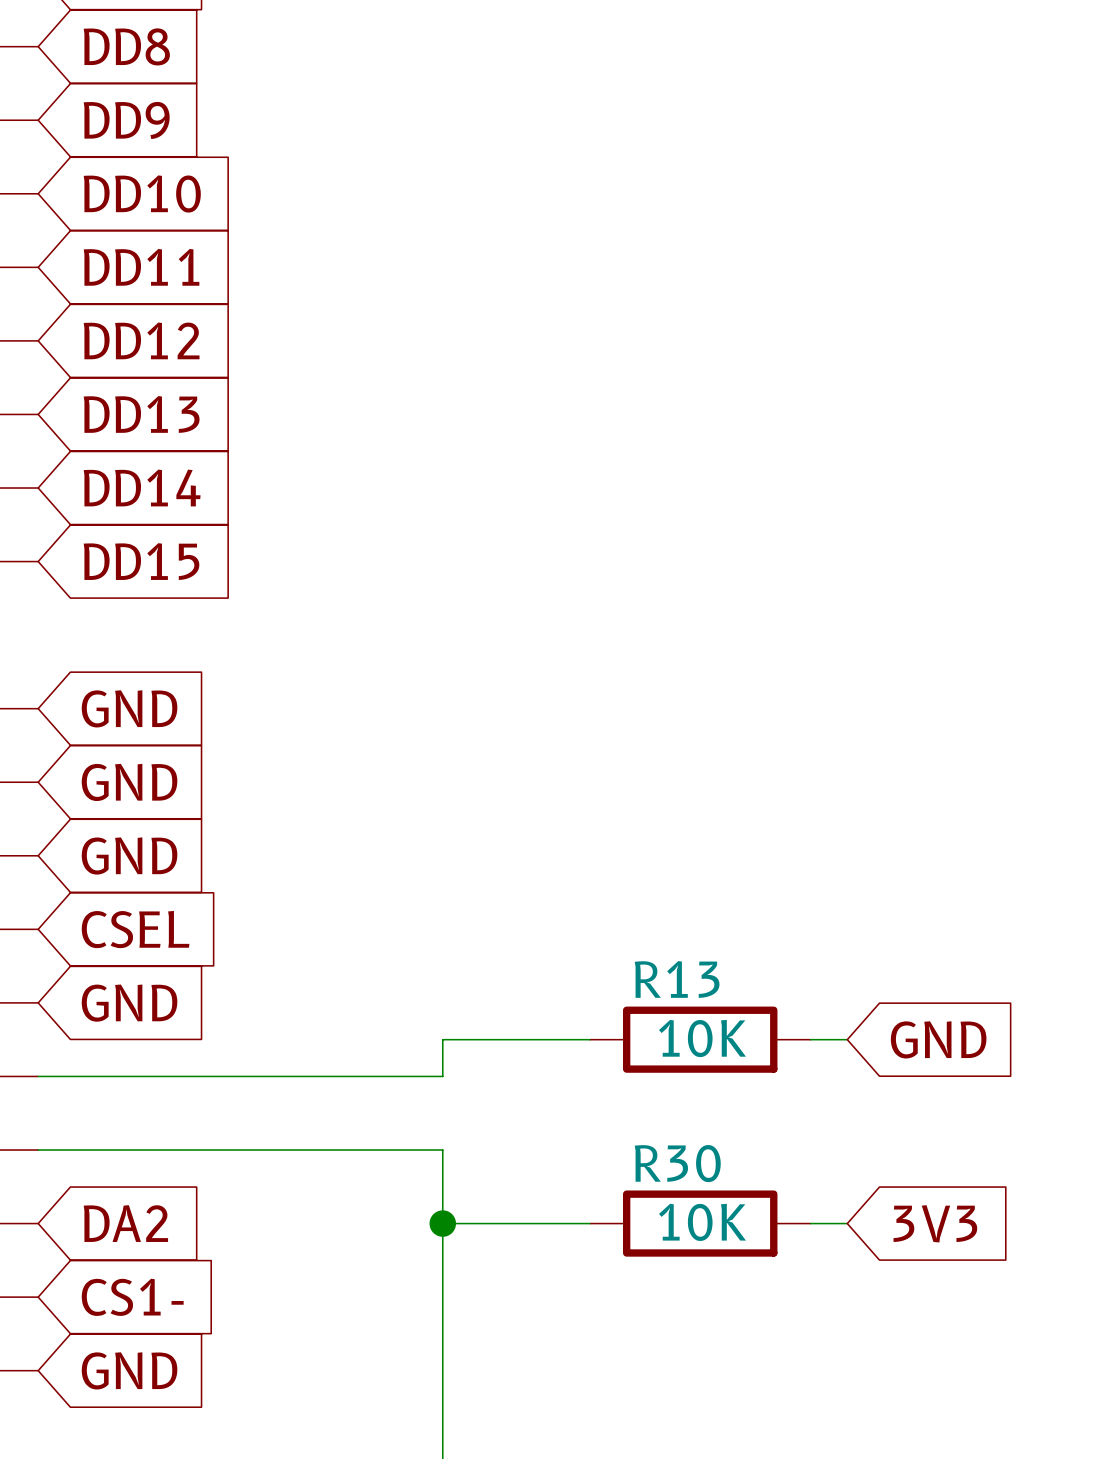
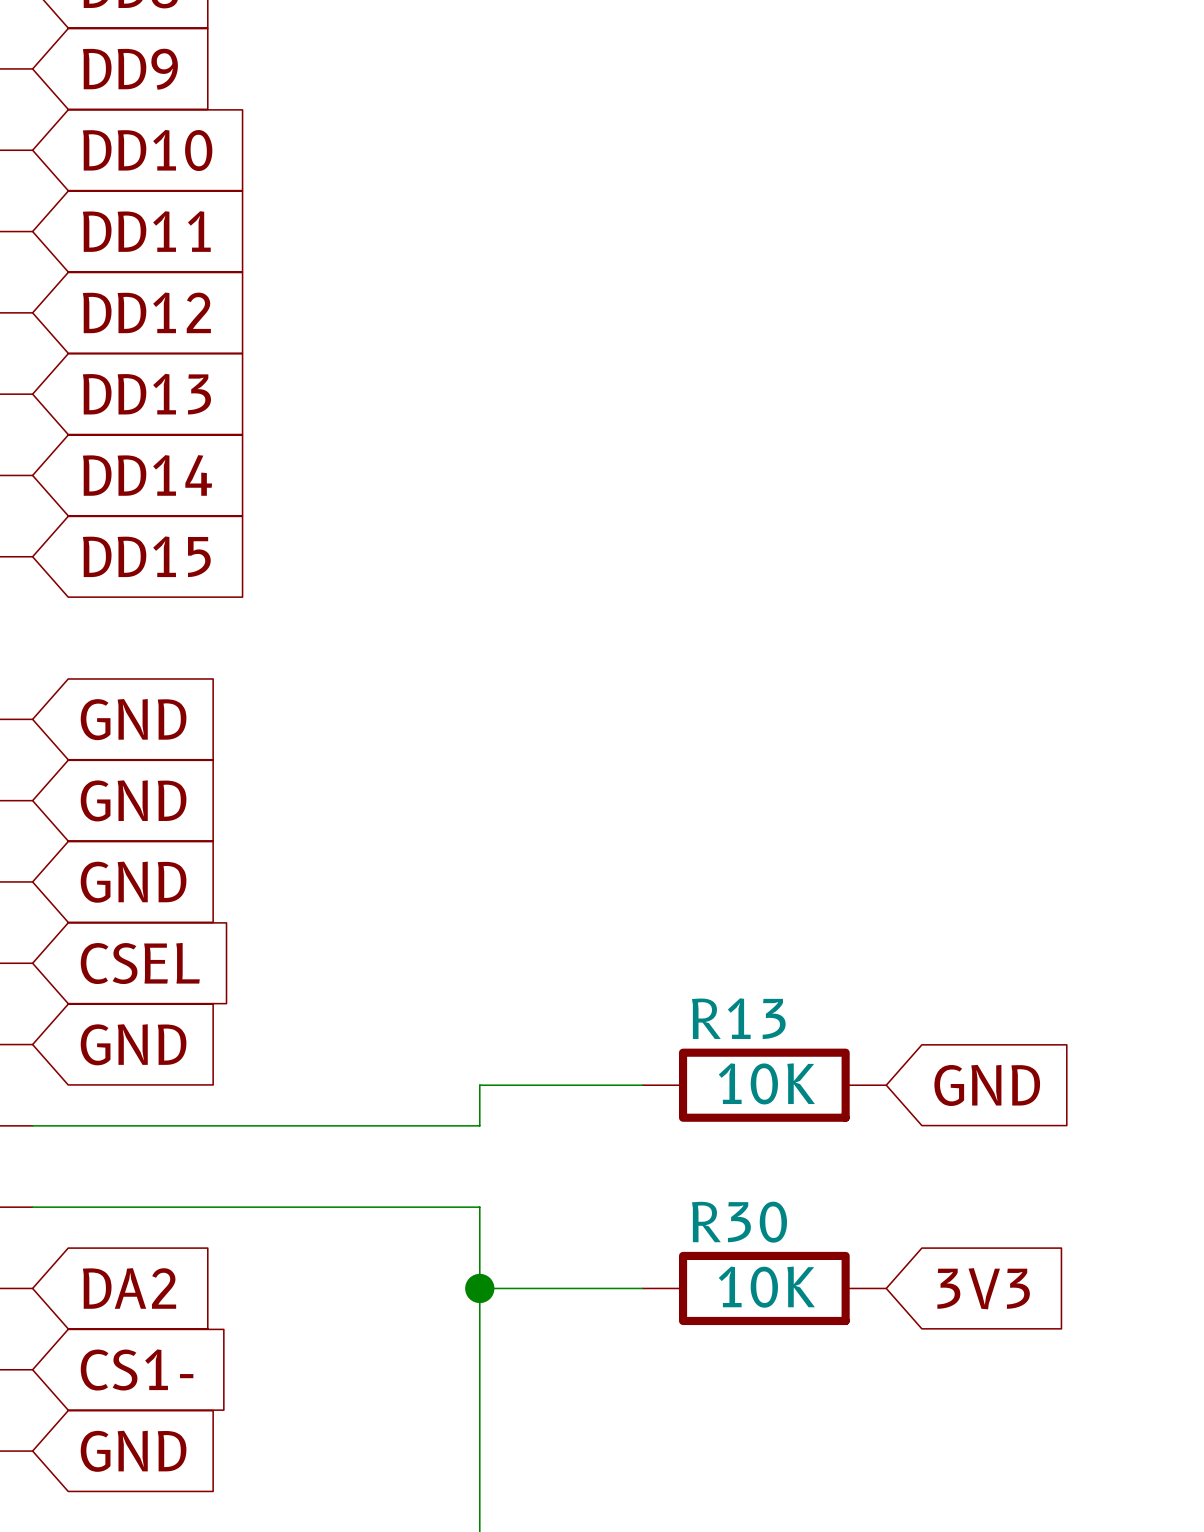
wire: (810, 1039) (847, 1039) -> none
global label position: GND (938, 1039) -> GND (987, 1085)
wire: (810, 1223) (847, 1223) -> none
global label position: 3V3 (935, 1223) -> 3V3 (983, 1288)

